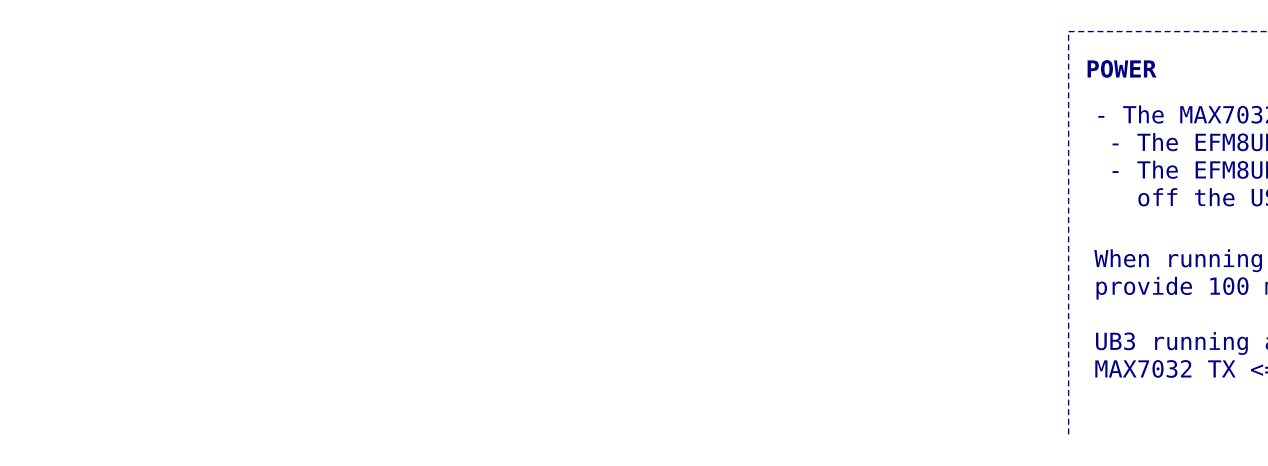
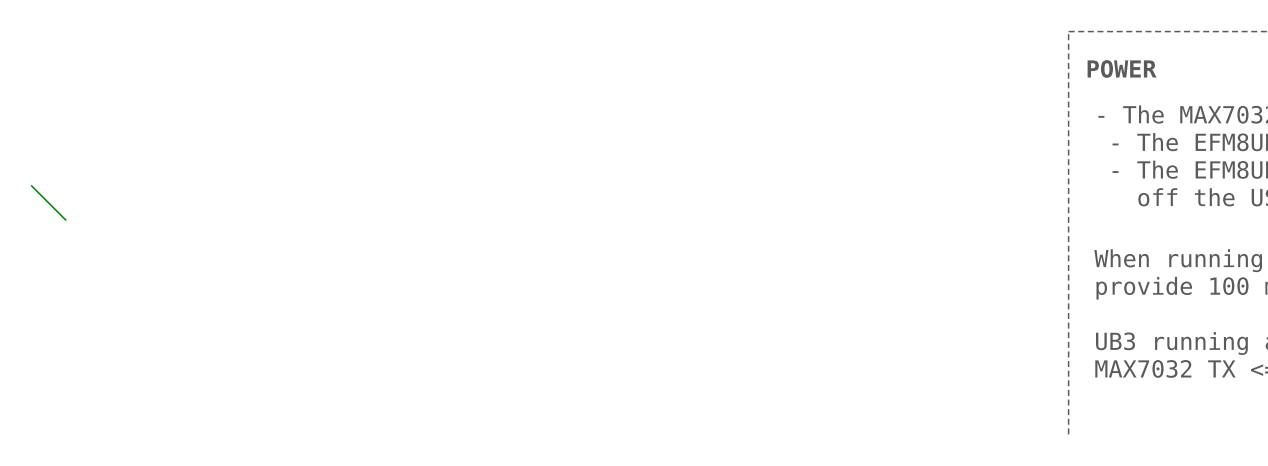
wire: none -> (31, 185) (65, 220)

